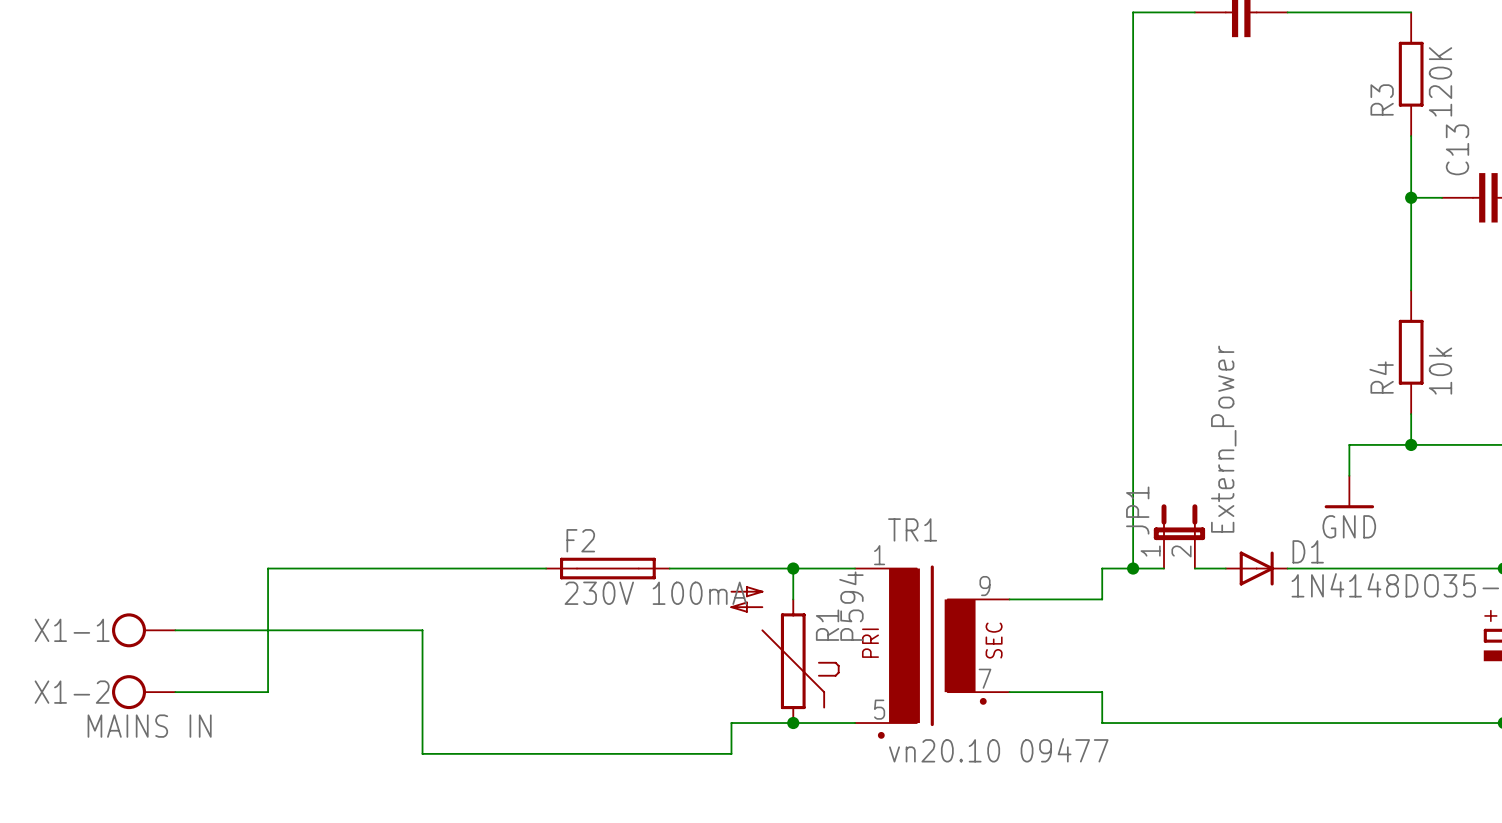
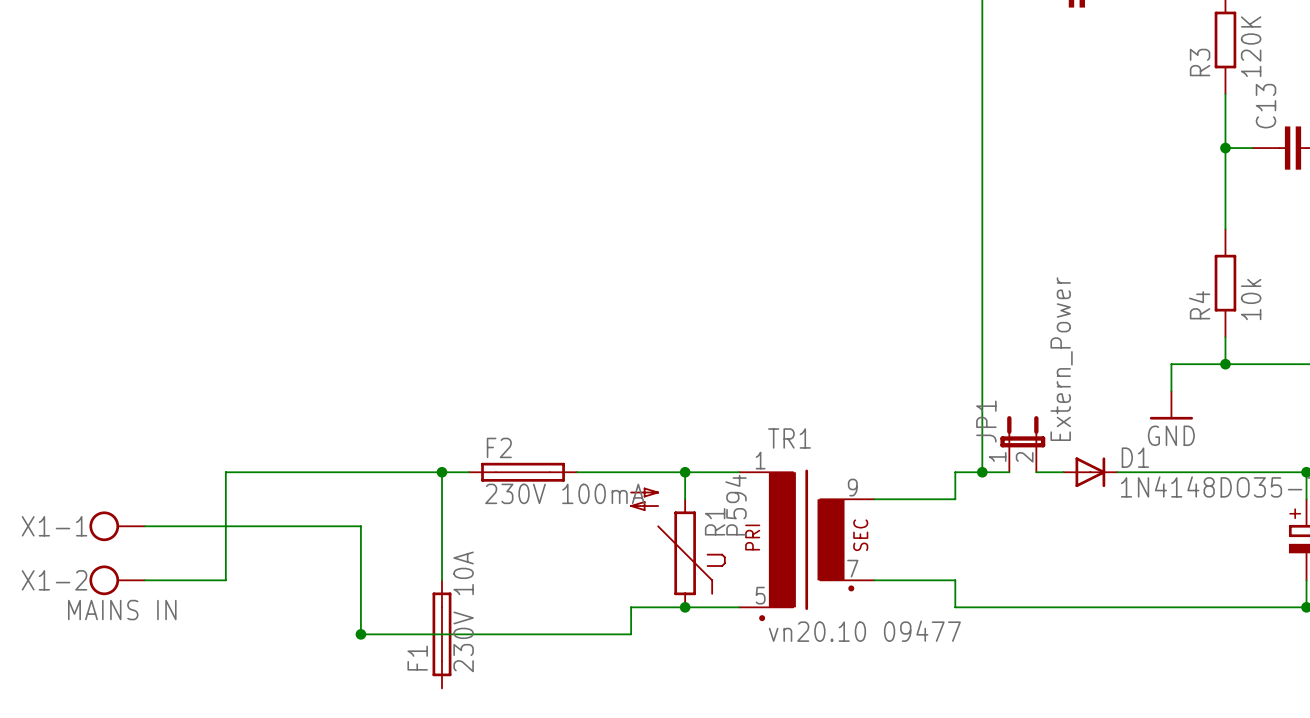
wire: none -> (441, 472) (441, 580)
junction: none -> (441, 472)
junction: none -> (360, 634)
F1: none -> 230V 10A (441, 634)

